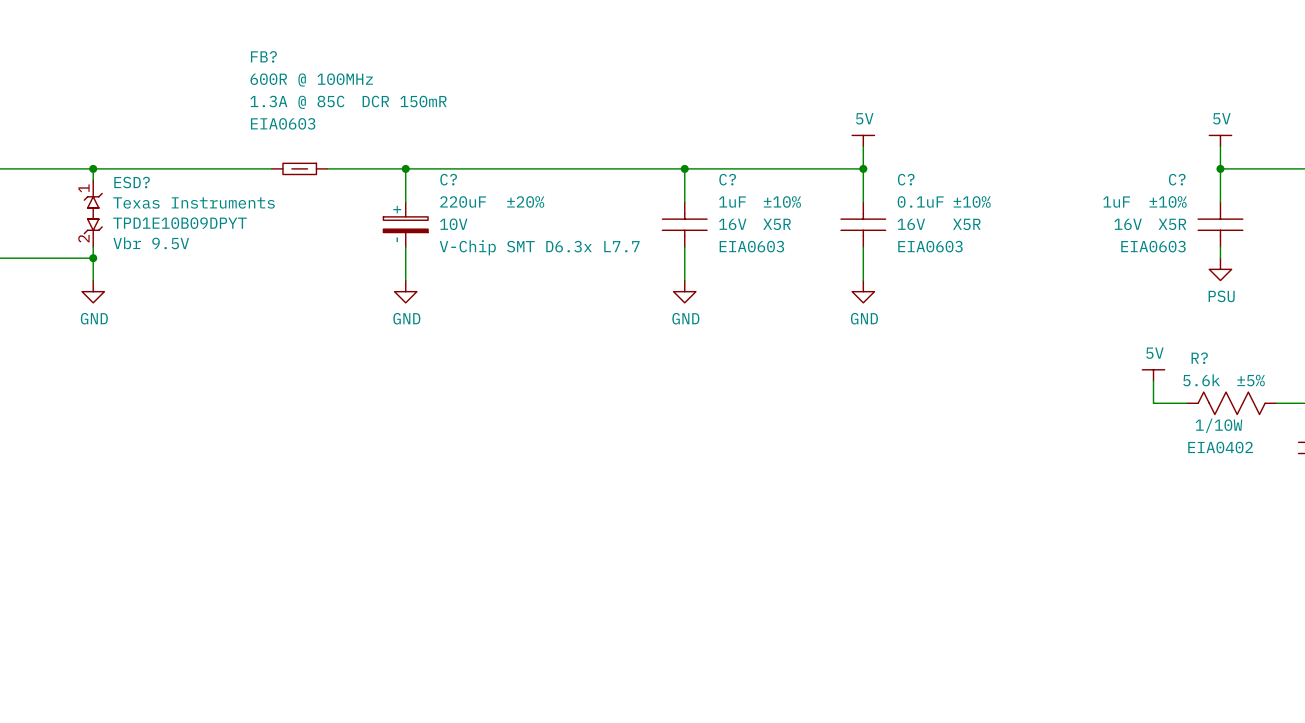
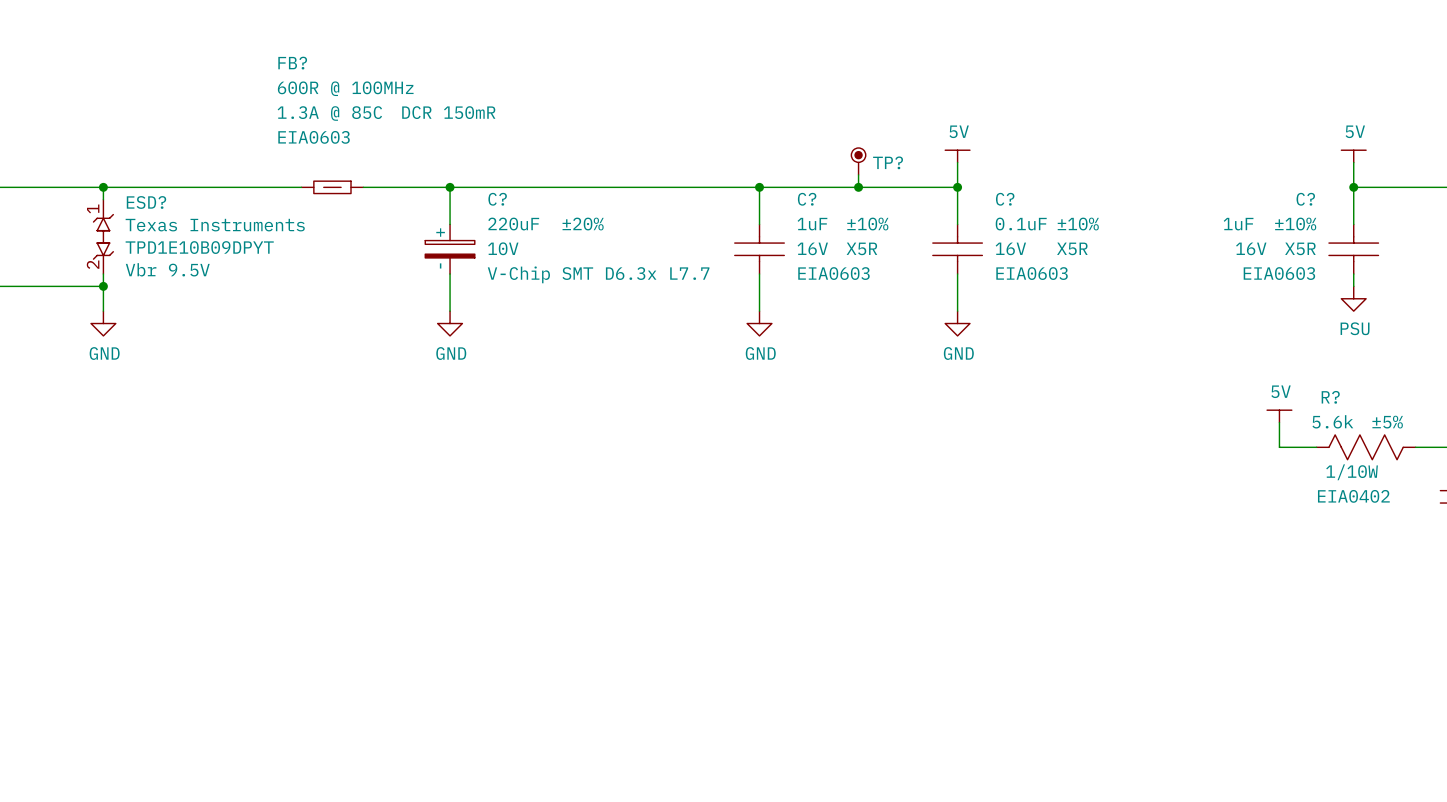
TP?: none -> (858, 161)
wire: none -> (858, 174) (858, 187)
junction: none -> (858, 187)

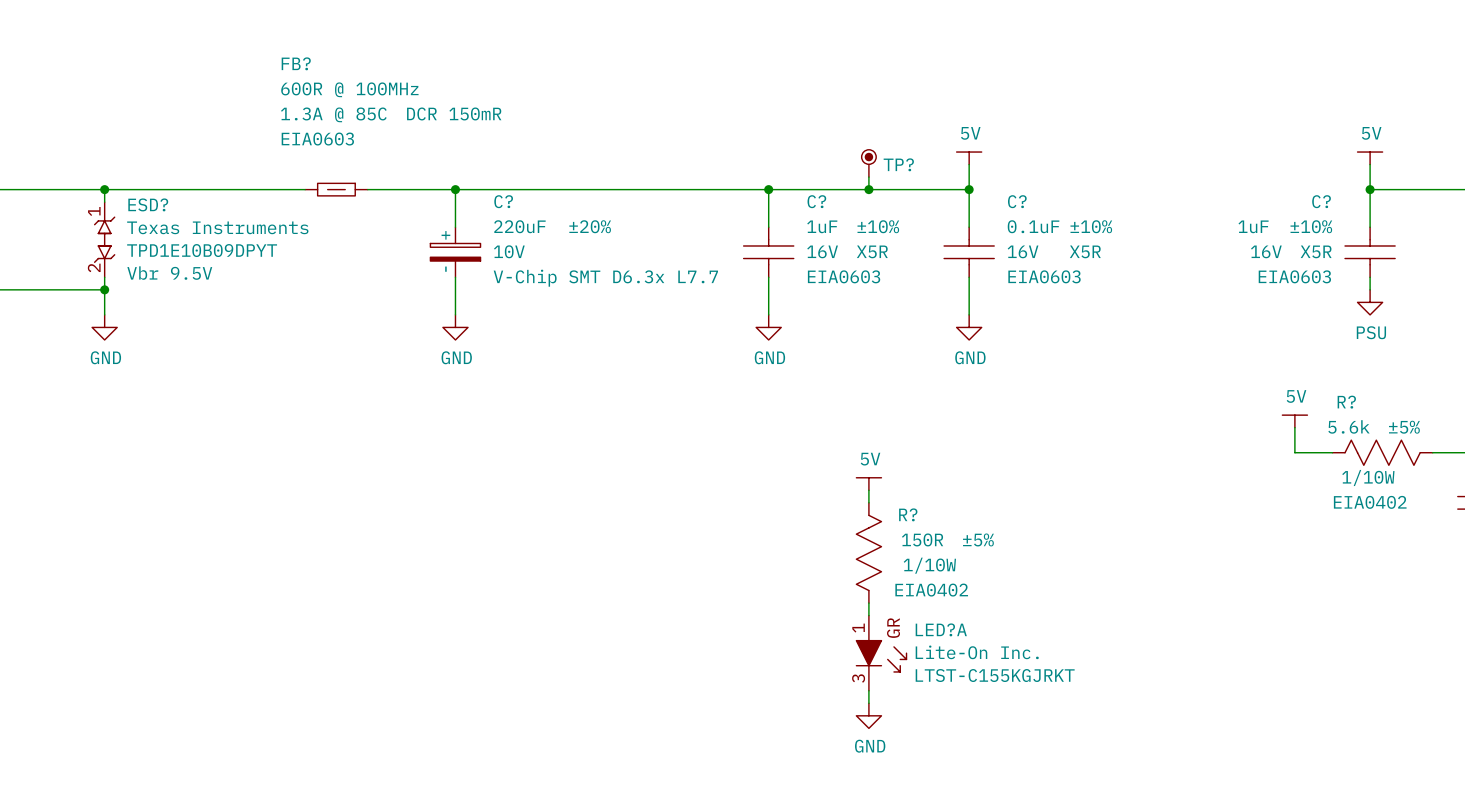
power symbol: none -> 5V (868, 484)
wire: none -> (868, 490) (868, 502)
R?: none -> (868, 552)
wire: none -> (868, 603) (868, 615)
LED?A: none -> (881, 653)
wire: none -> (868, 690) (868, 703)
power symbol: none -> GND (868, 715)

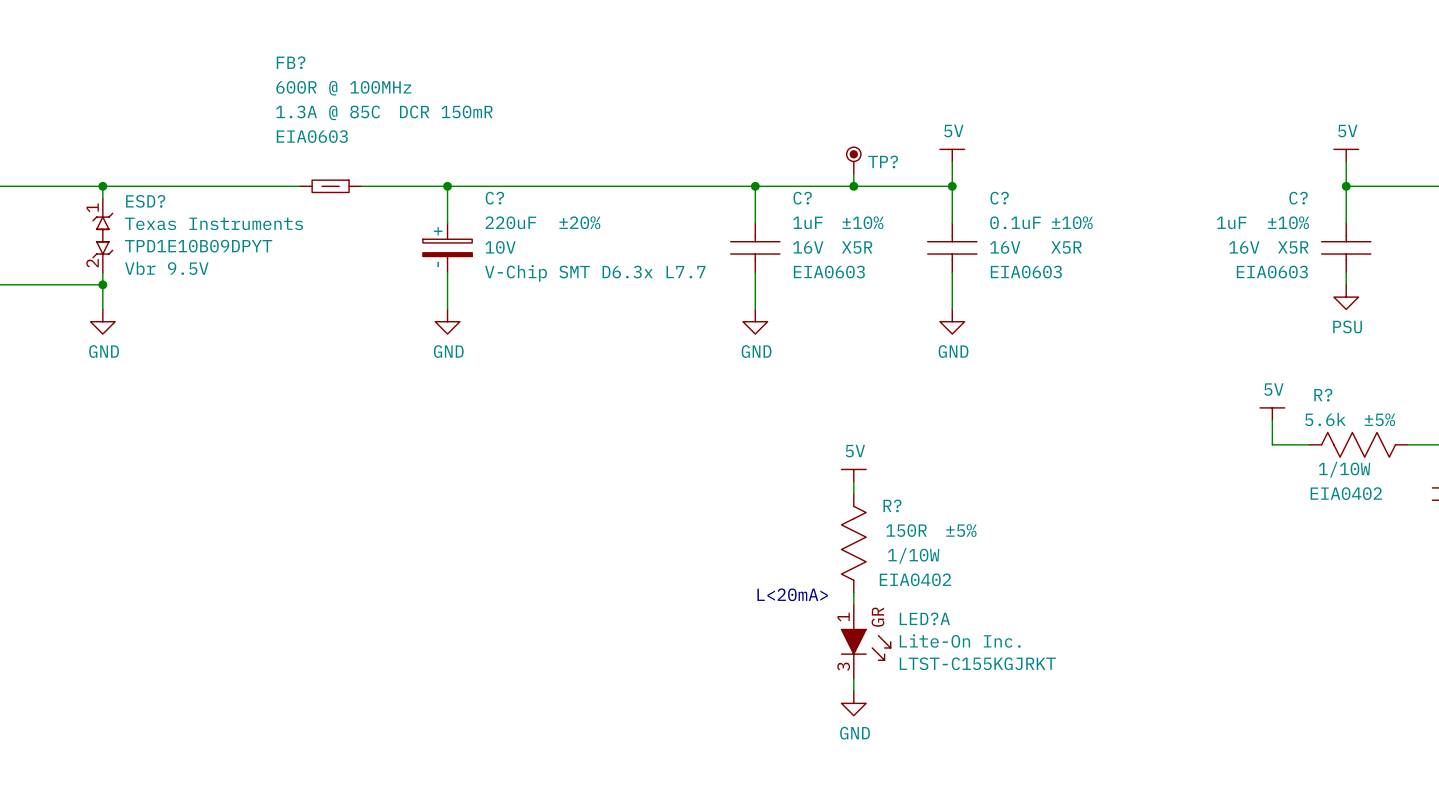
text: none -> L<20mA> (792, 594)

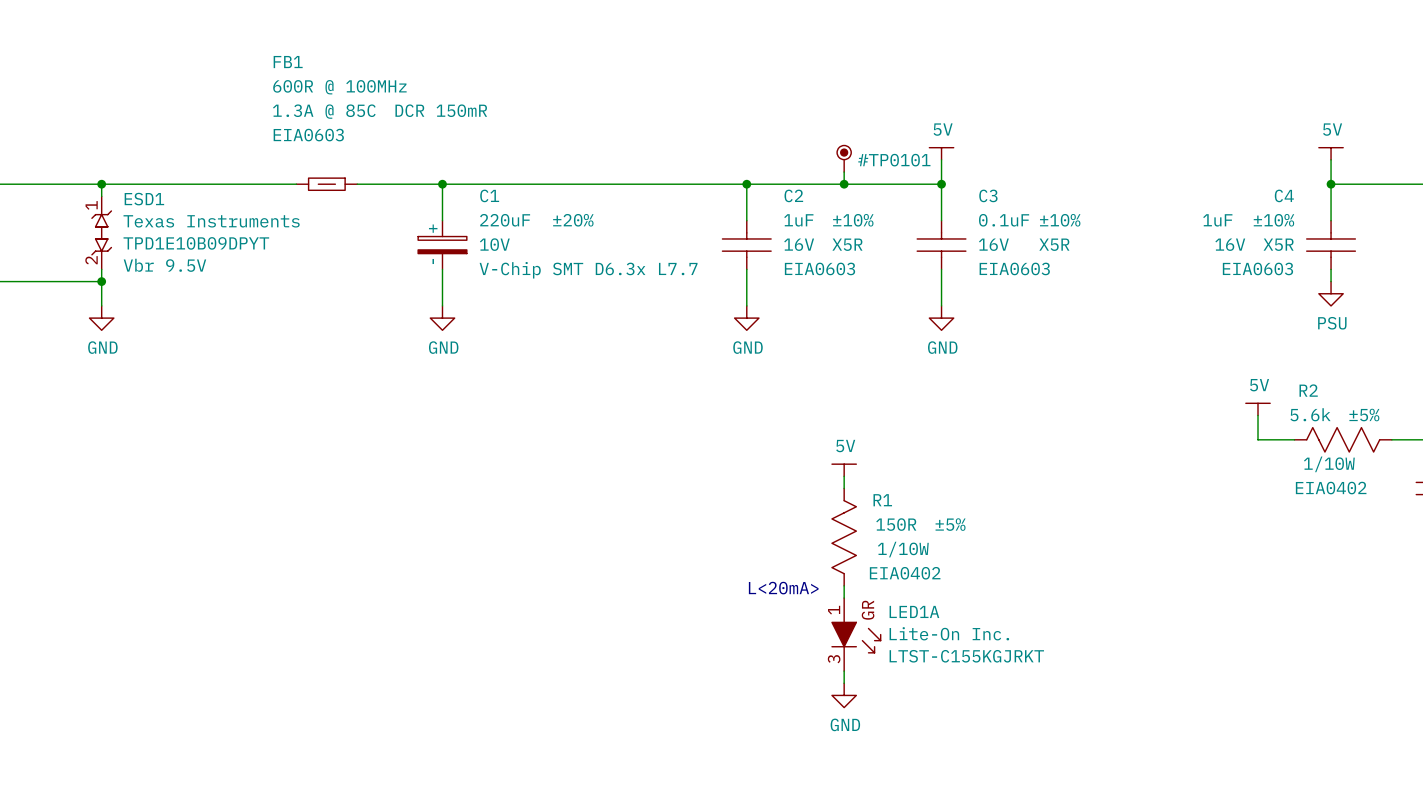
FB? name: FB? (291, 62) -> FB1 (288, 62)
TP?: (853, 160) -> none
#TP0101: none -> (844, 158)
C? name: C? (494, 198) -> C1 (489, 195)
C? name: C? (802, 198) -> C2 (793, 195)
C? name: C? (999, 198) -> C3 (988, 195)
C? name: C? (1298, 198) -> C4 (1284, 195)
ESD? name: ESD? (145, 201) -> ESD1 (144, 199)
R? name: R? (1323, 395) -> R2 (1308, 390)
R? name: R? (892, 505) -> R1 (882, 500)
LED?A name: LED?A (924, 618) -> LED1A (914, 611)

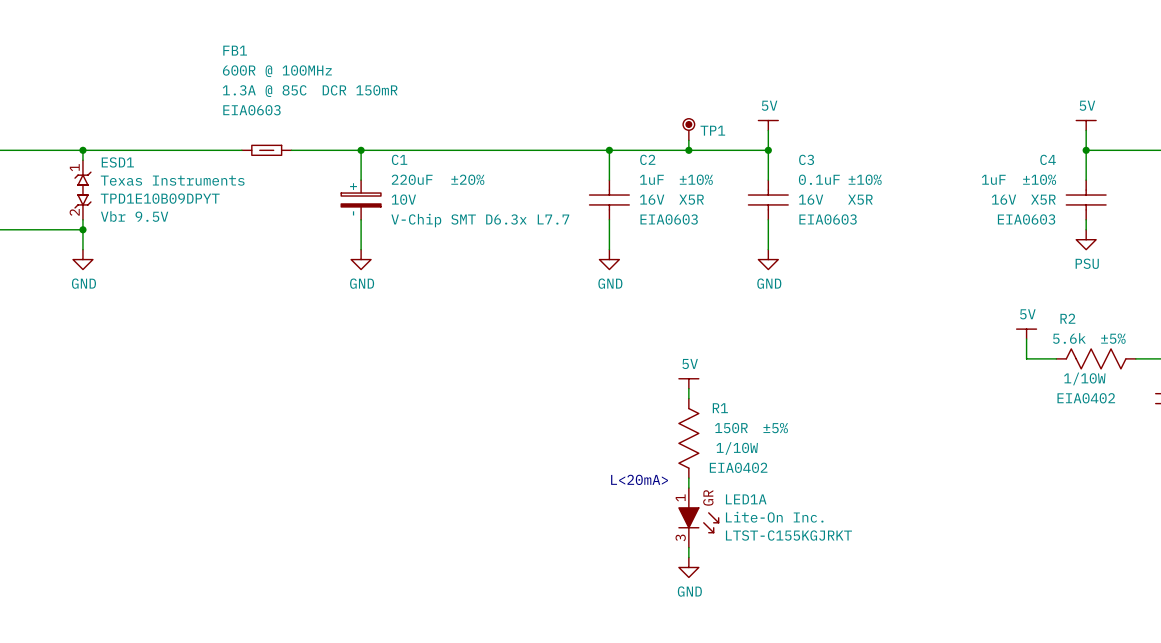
#TP0101: (844, 158) -> none
TP1: none -> (688, 129)

